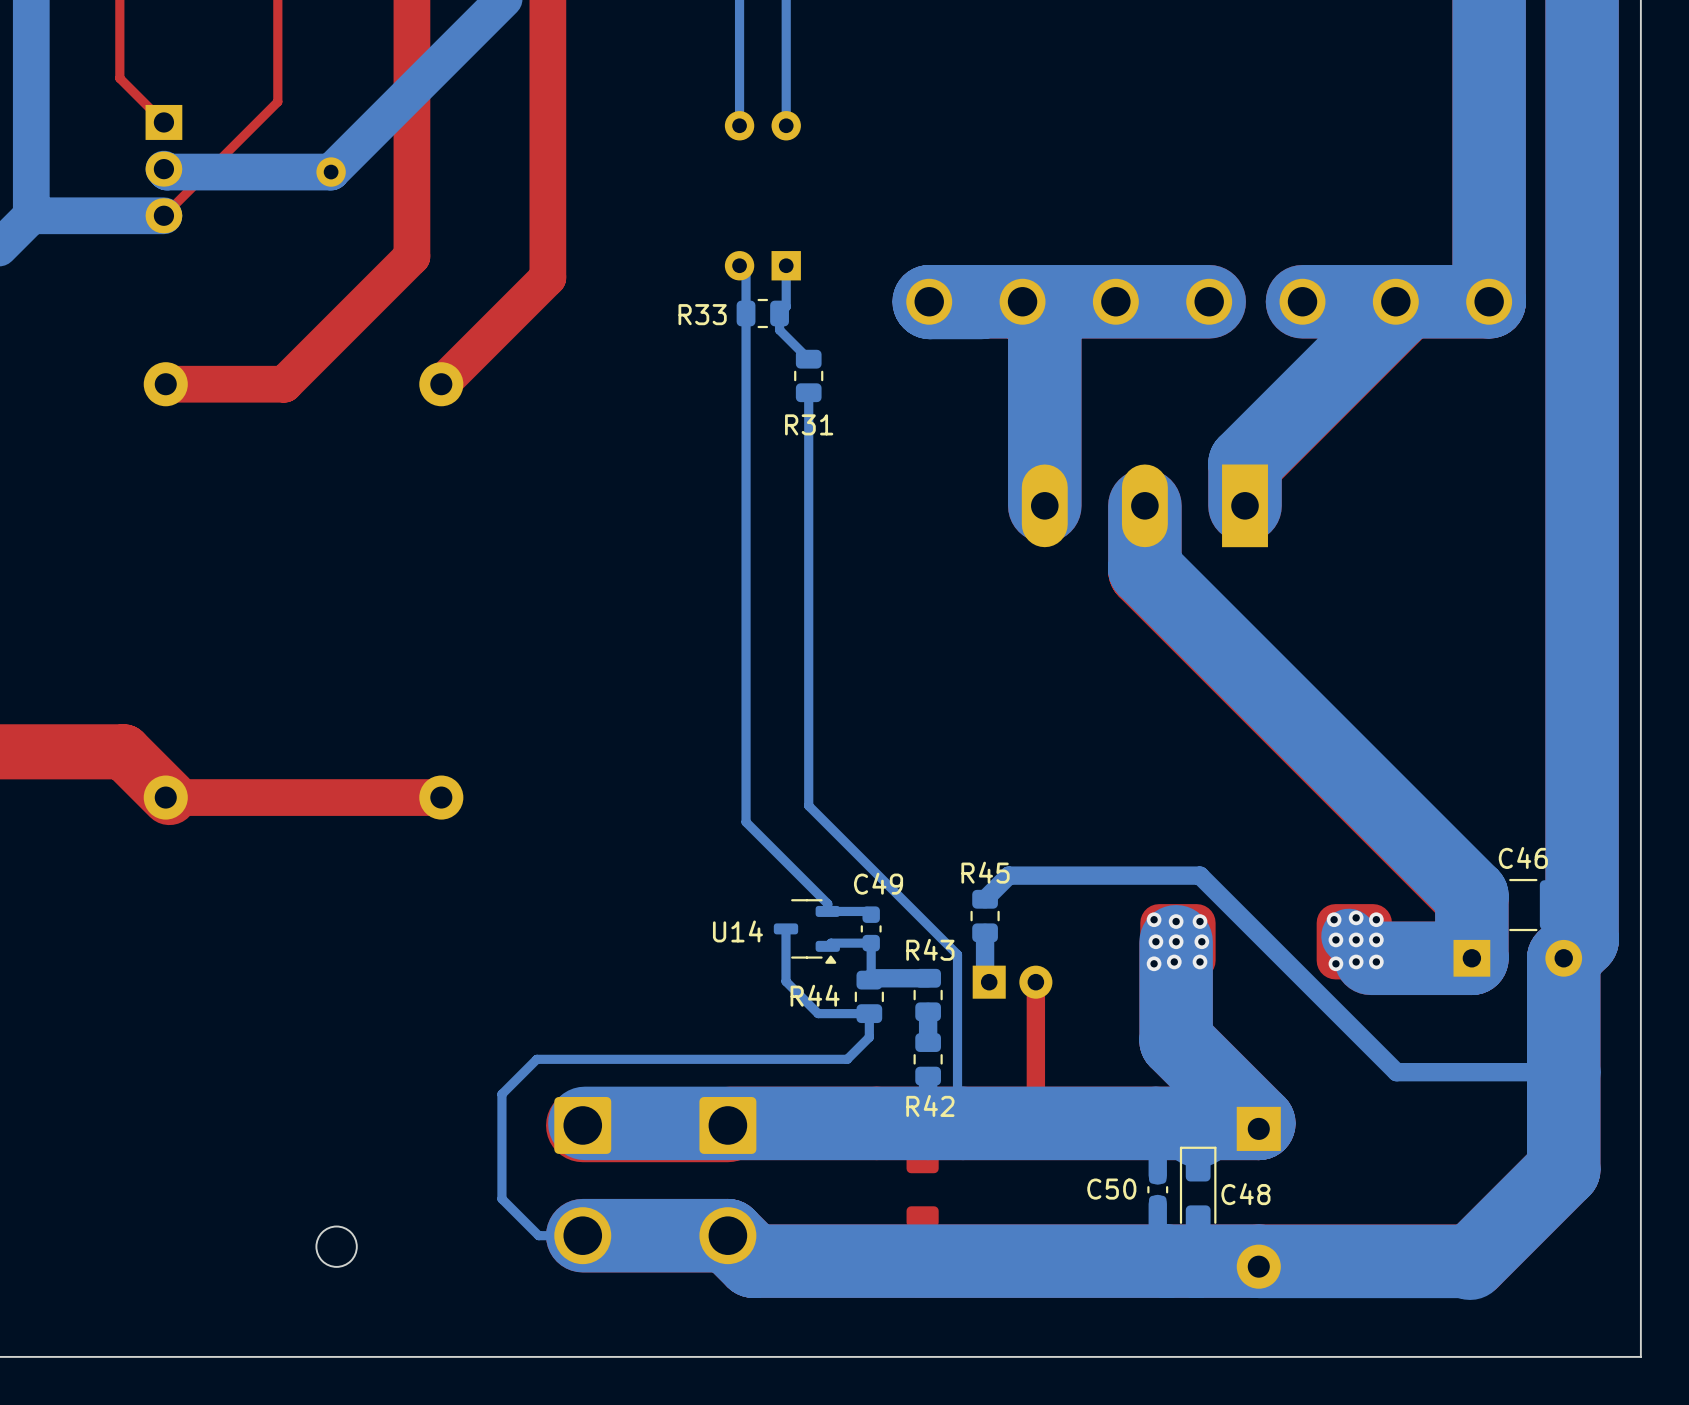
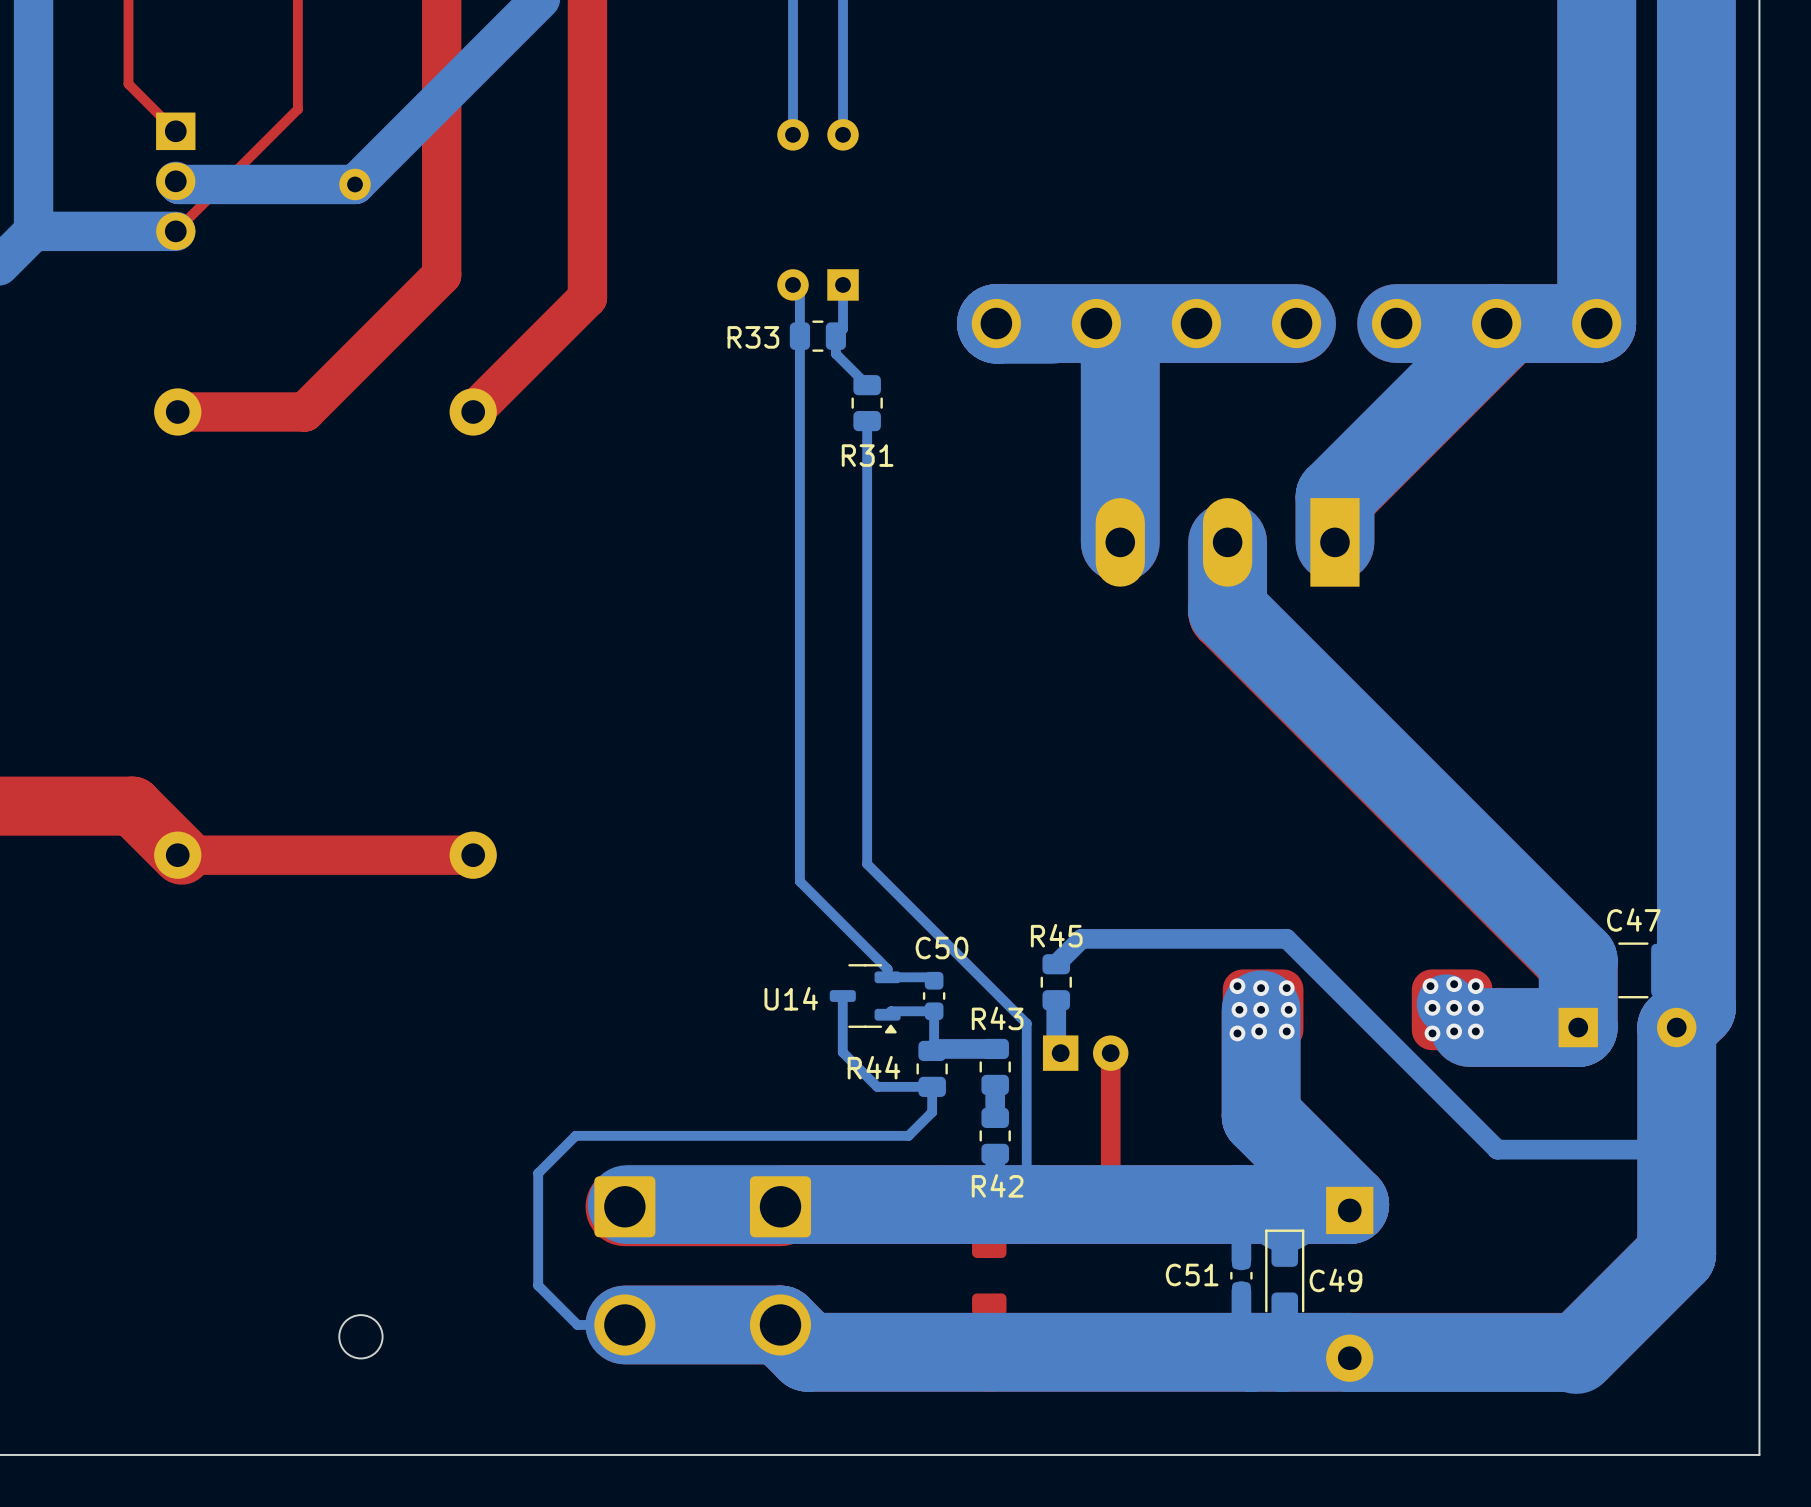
C46 name: C46 (1523, 857) -> C47 (1633, 919)
C49 name: C49 (878, 883) -> C50 (942, 948)
C50 name: C50 (1111, 1189) -> C51 (1192, 1274)
C48 name: C48 (1245, 1194) -> C49 (1335, 1280)

